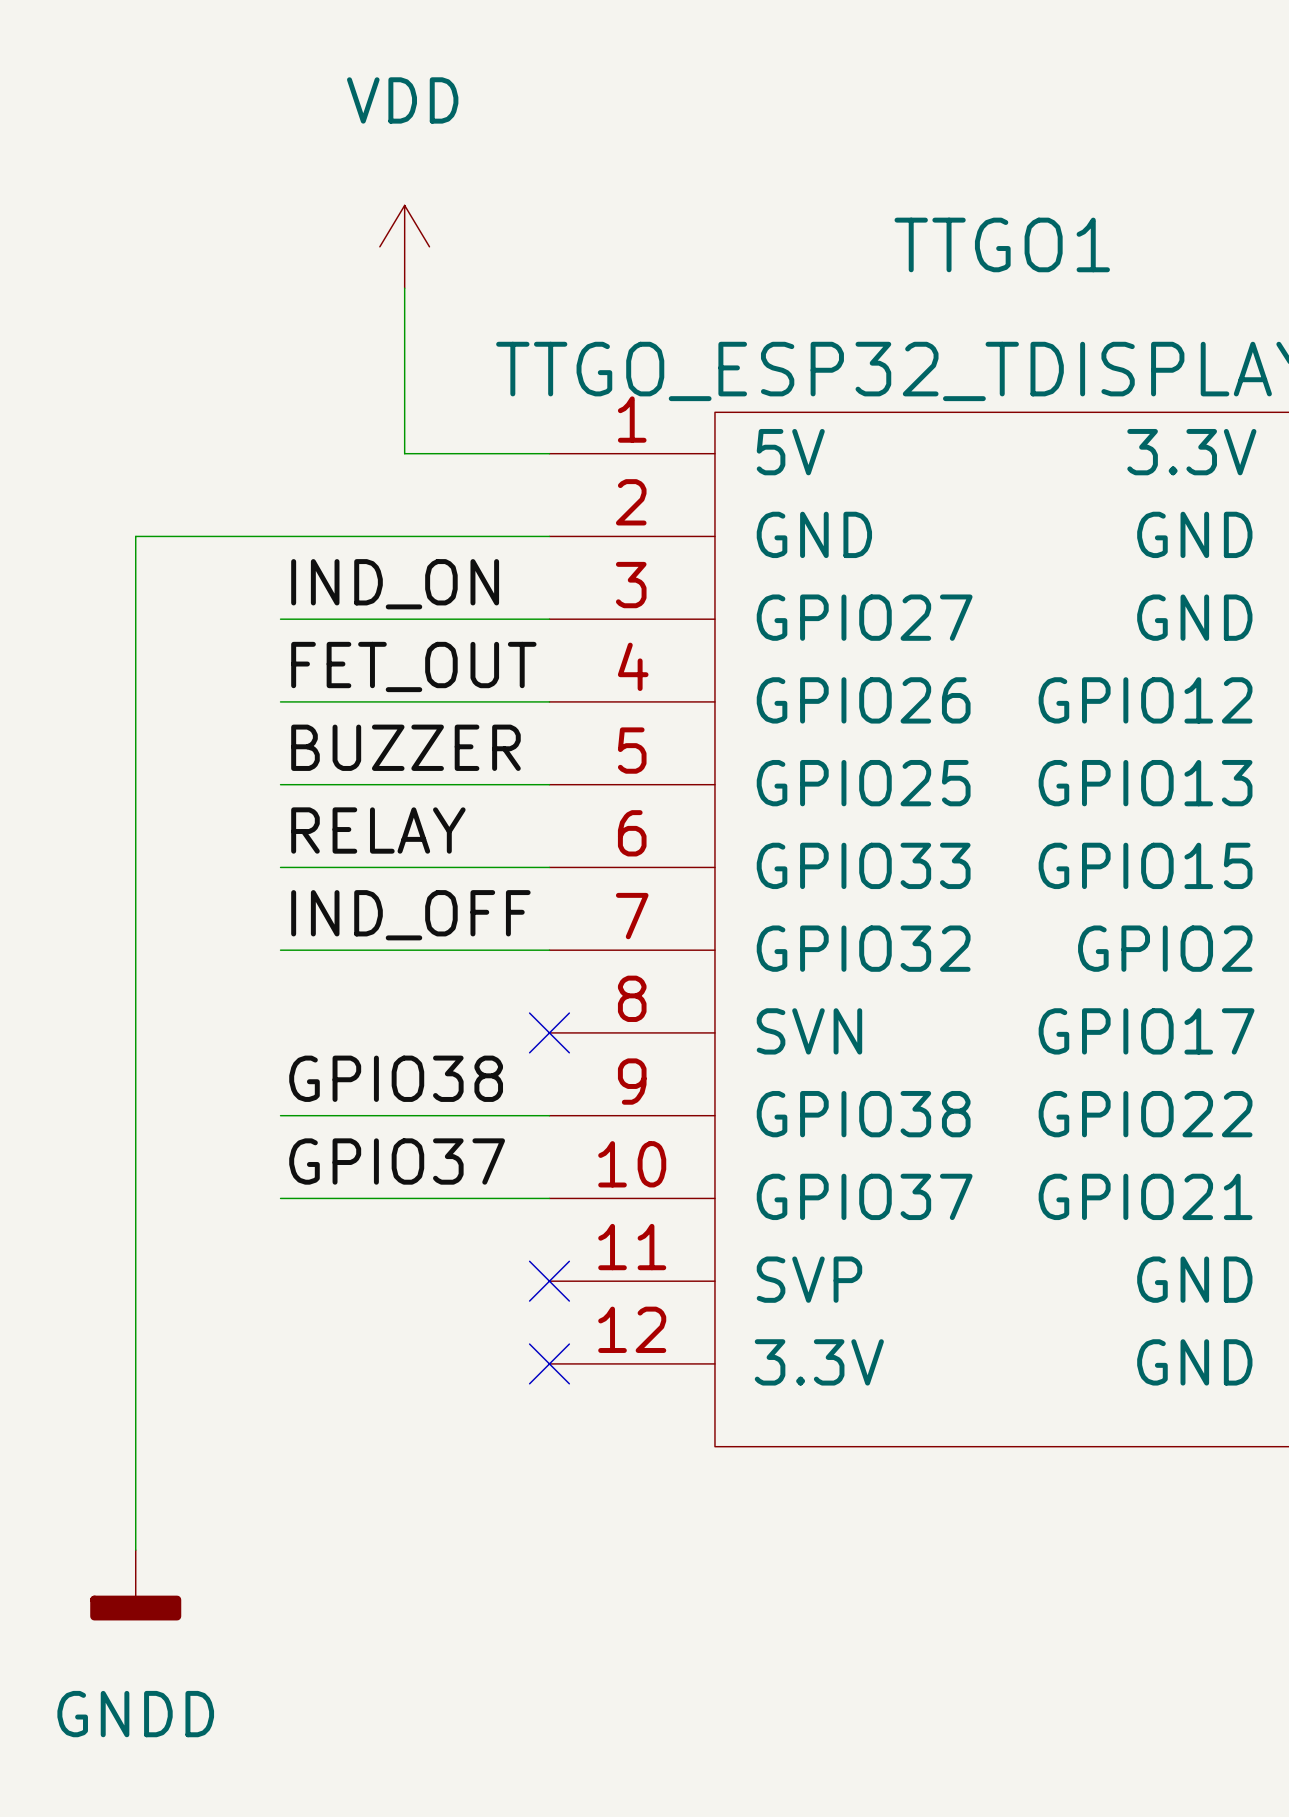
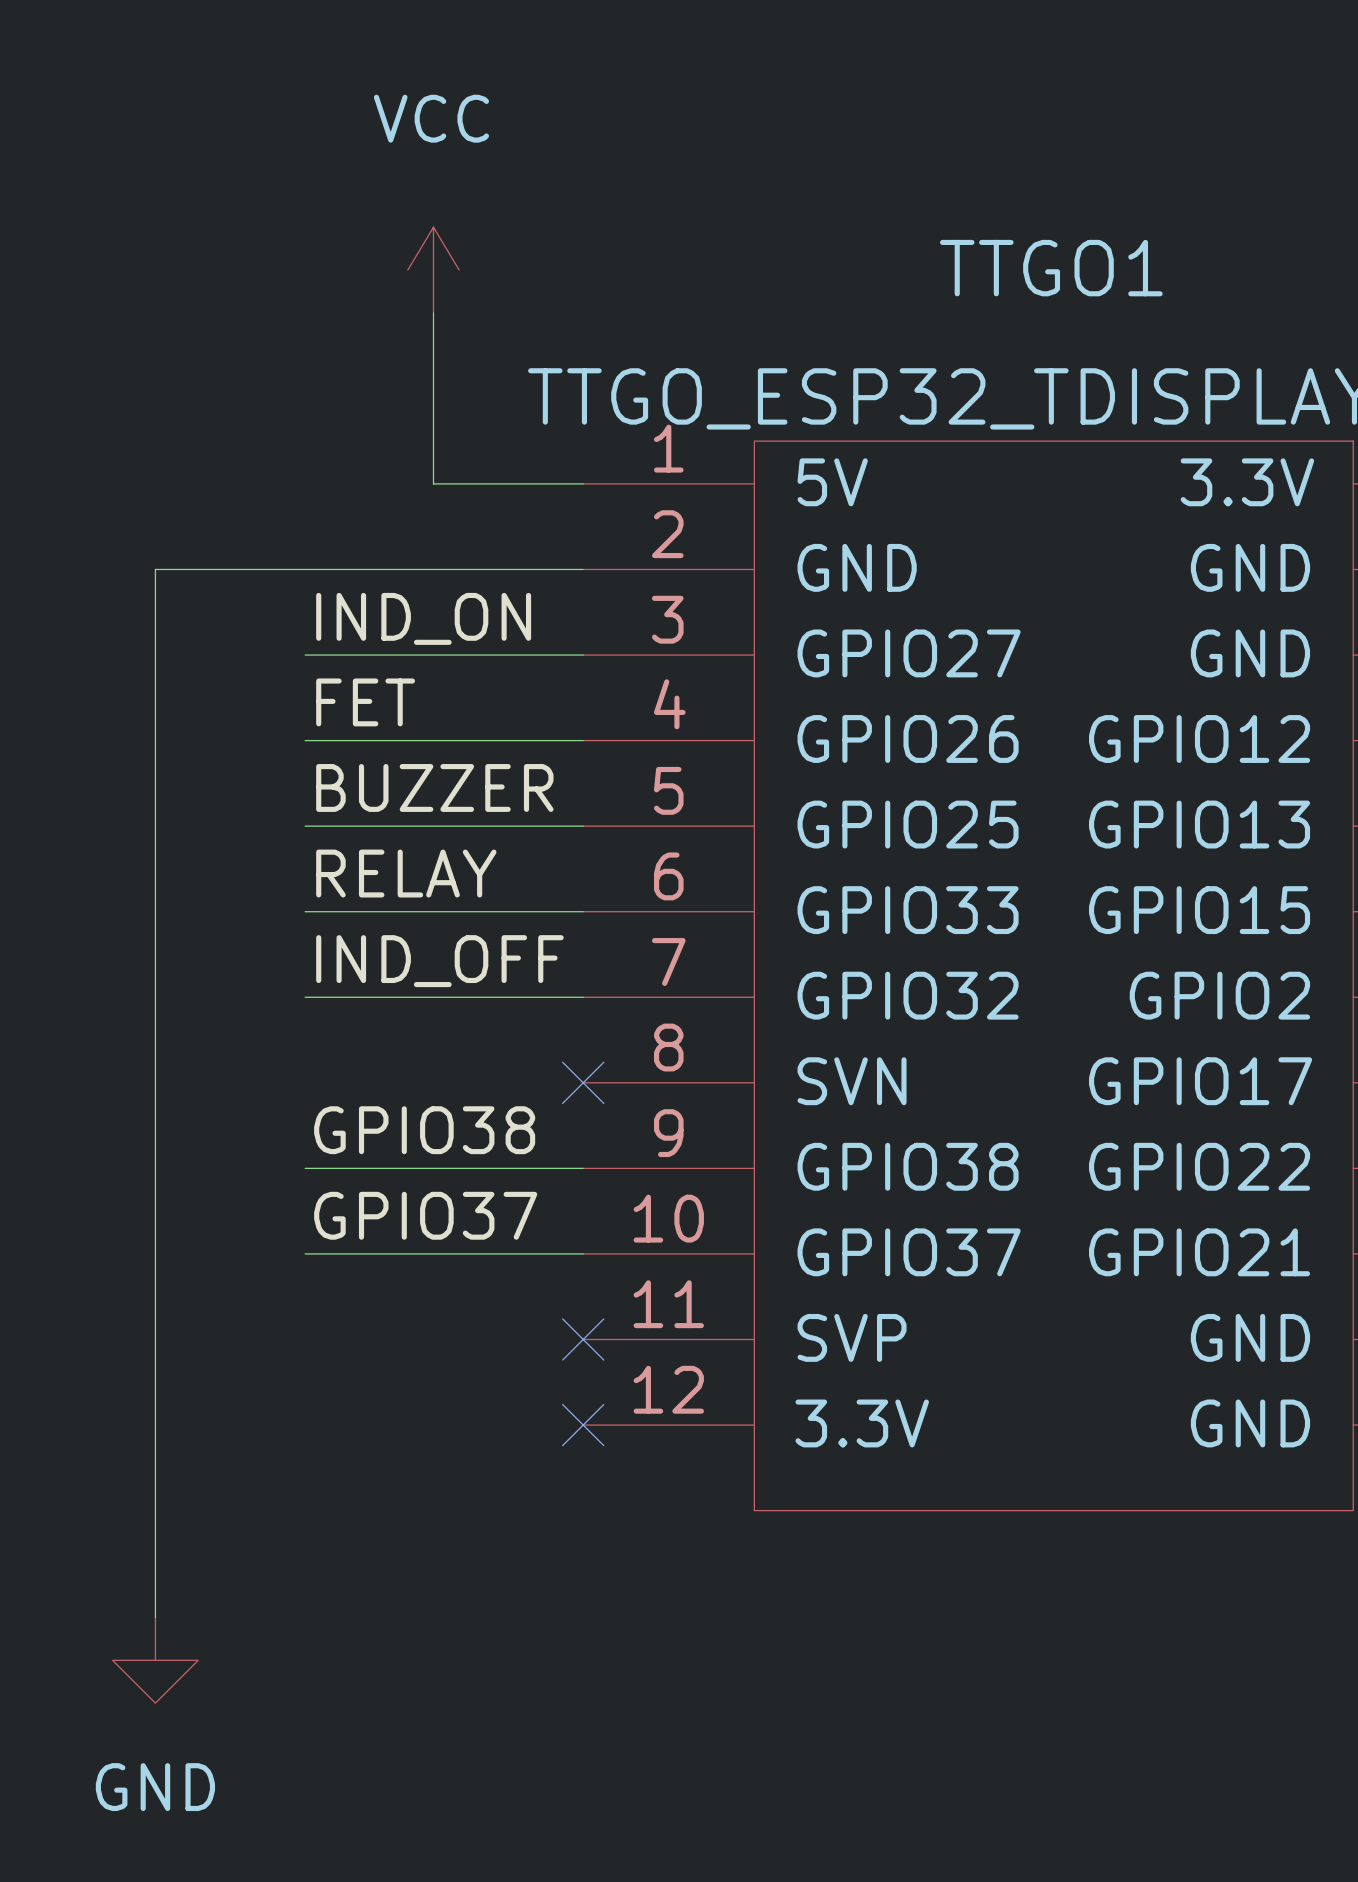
power symbol: VDD (404, 246) -> VCC (433, 270)
label: FET_OUT (413, 666) -> FET (365, 702)
power symbol: GNDD (135, 1585) -> GND (155, 1660)

